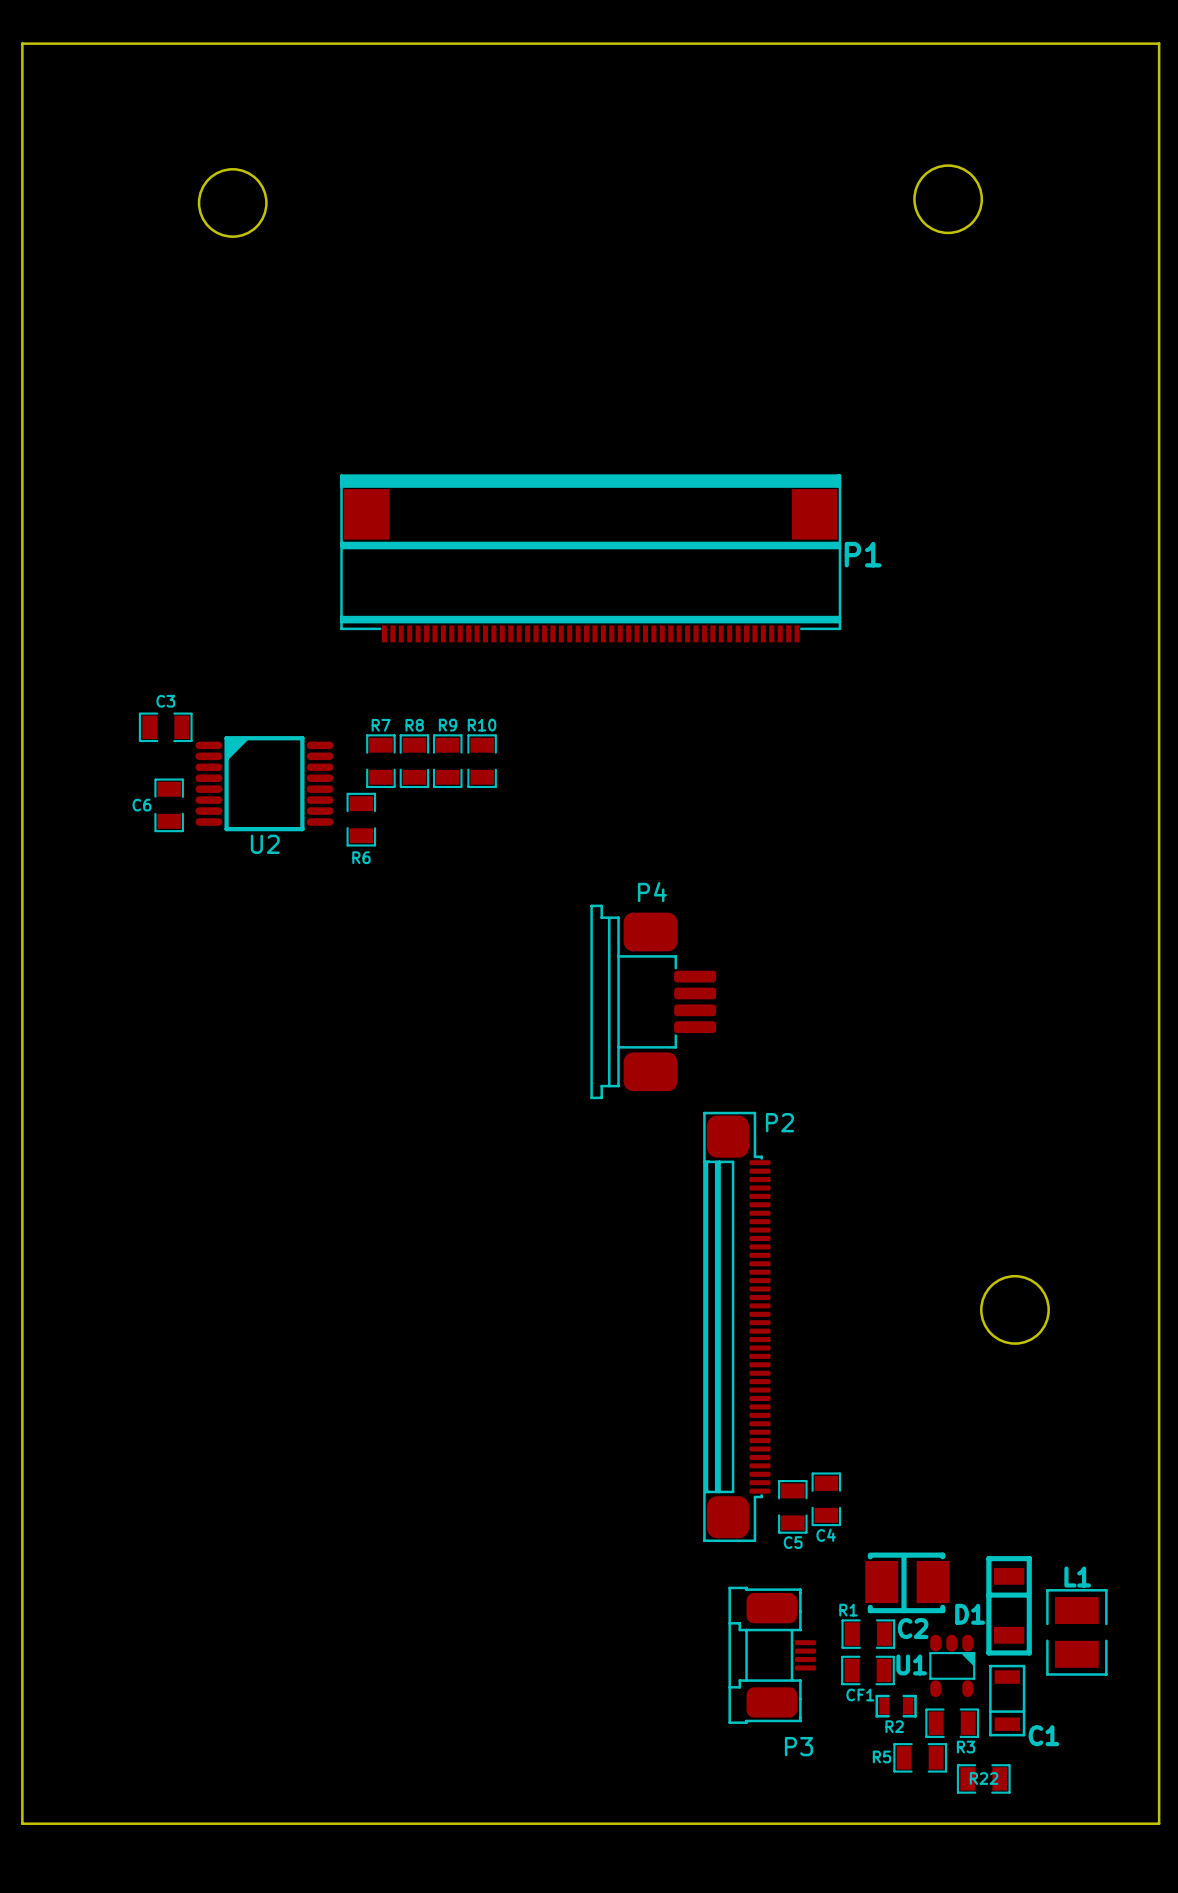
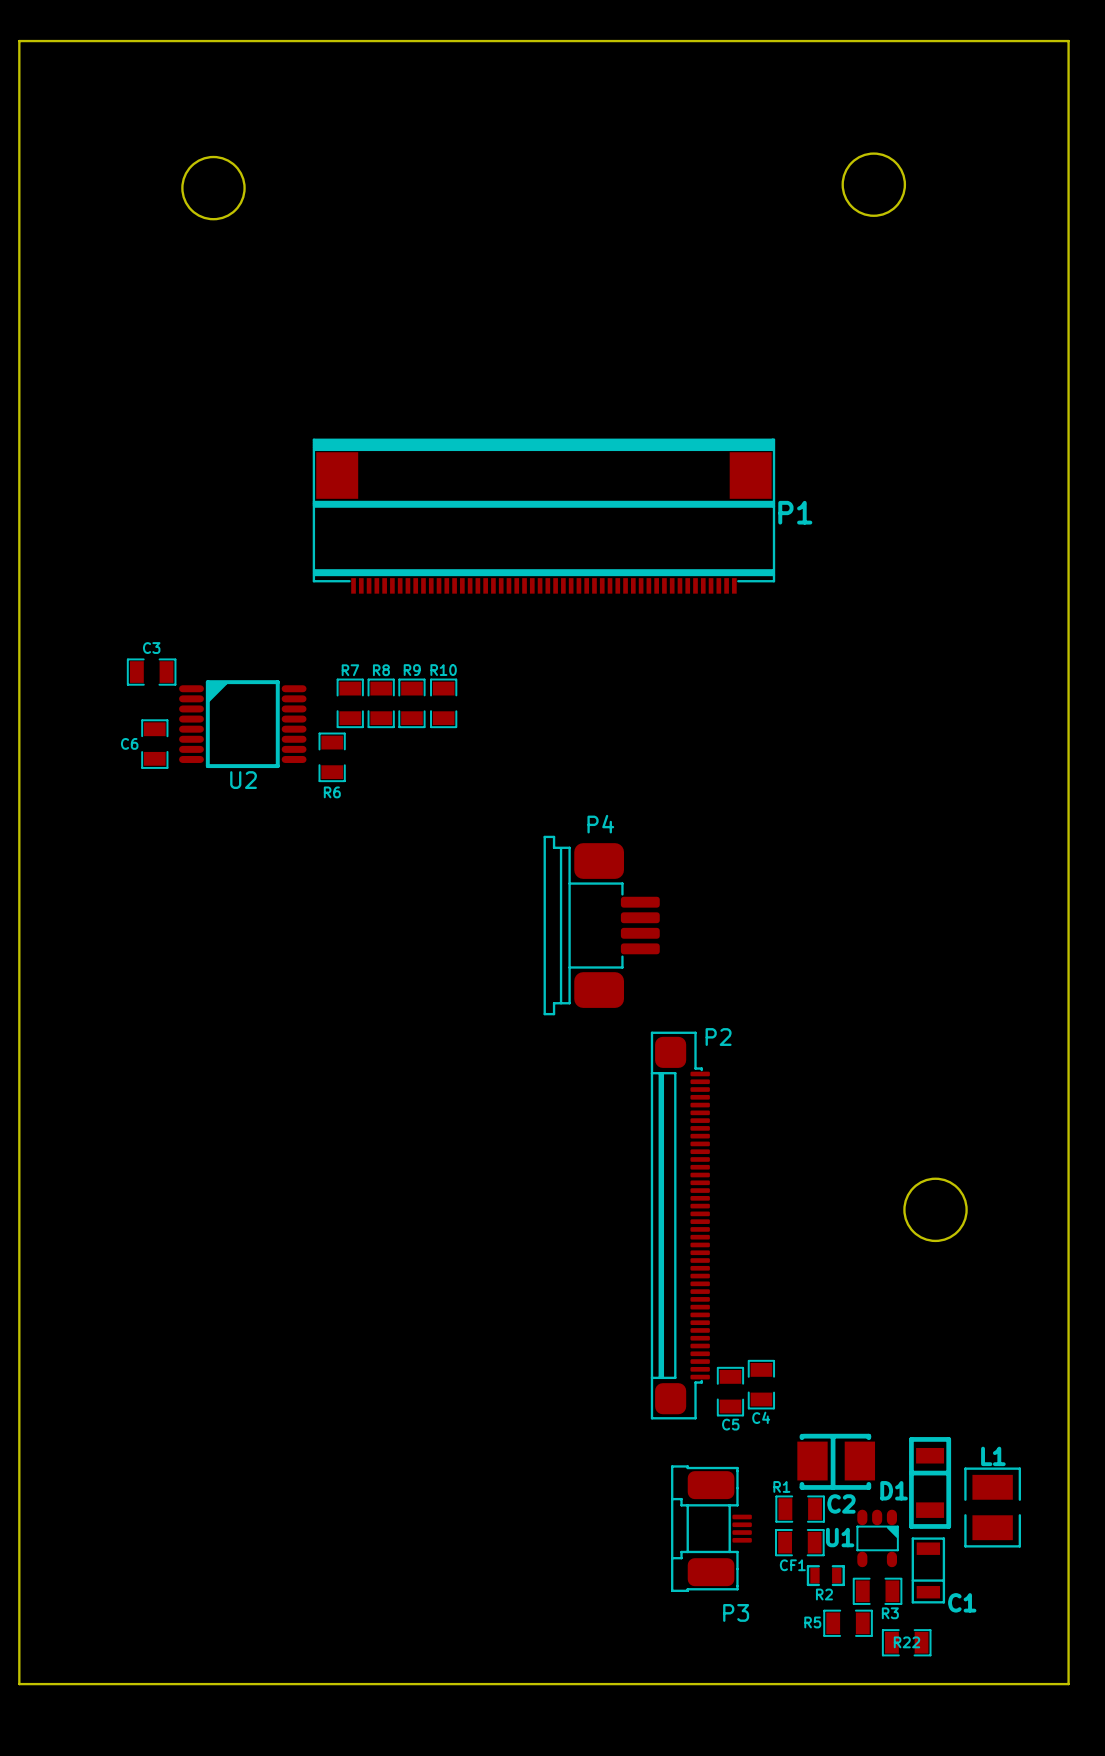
P2 footprint: [703, 1111, 771, 1543] -> [650, 1031, 710, 1420]

